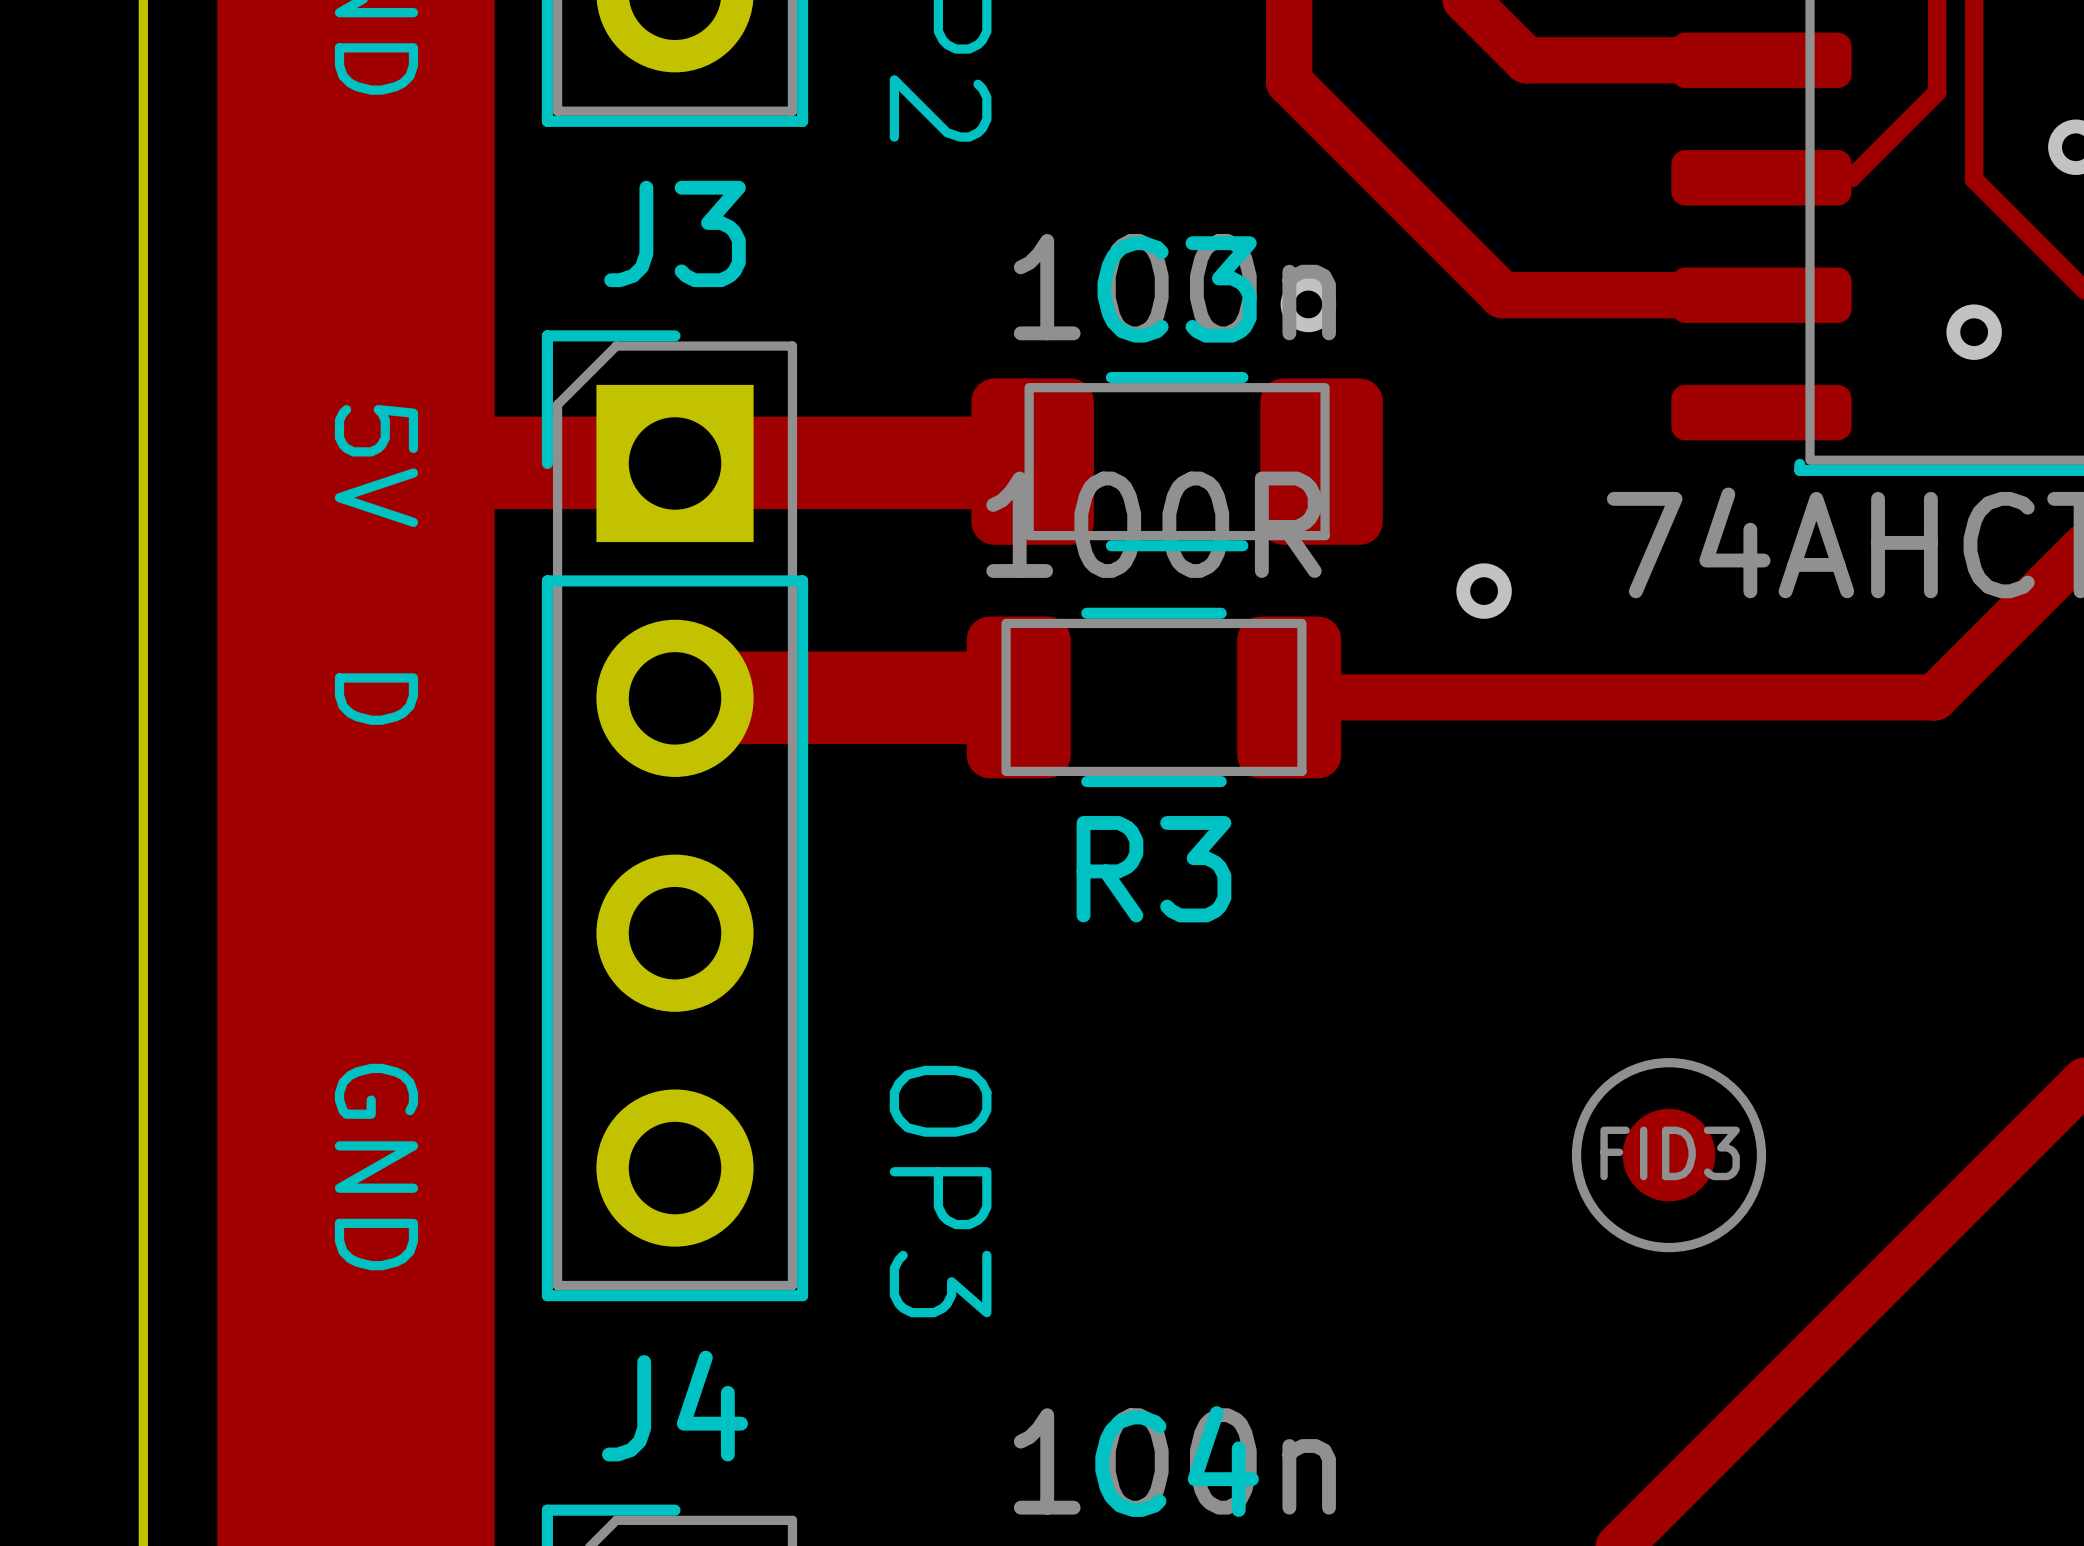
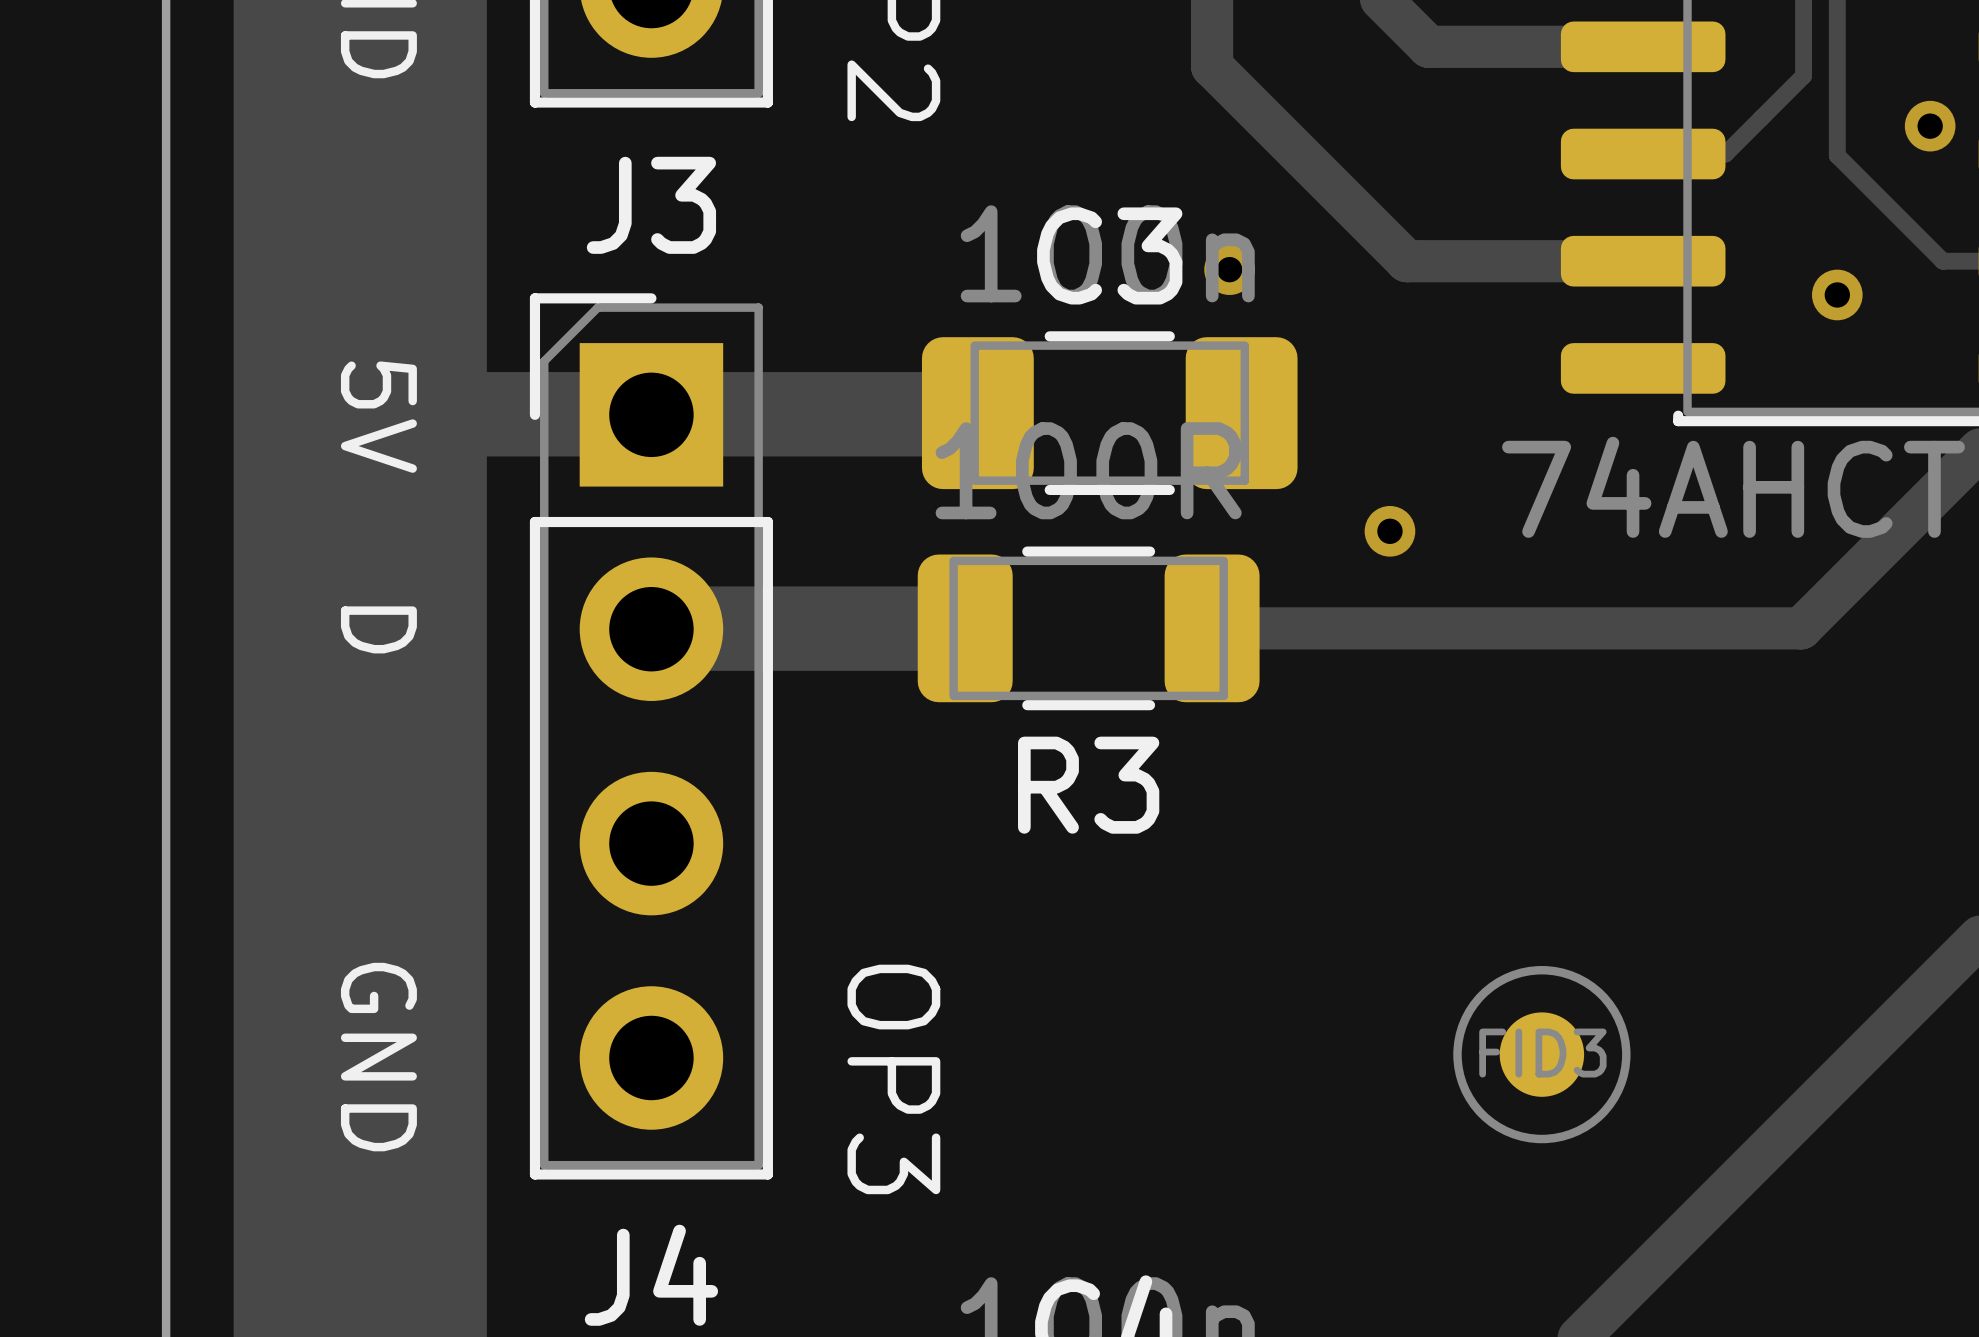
FID3 position: (1669, 1155) -> (1541, 1054)

